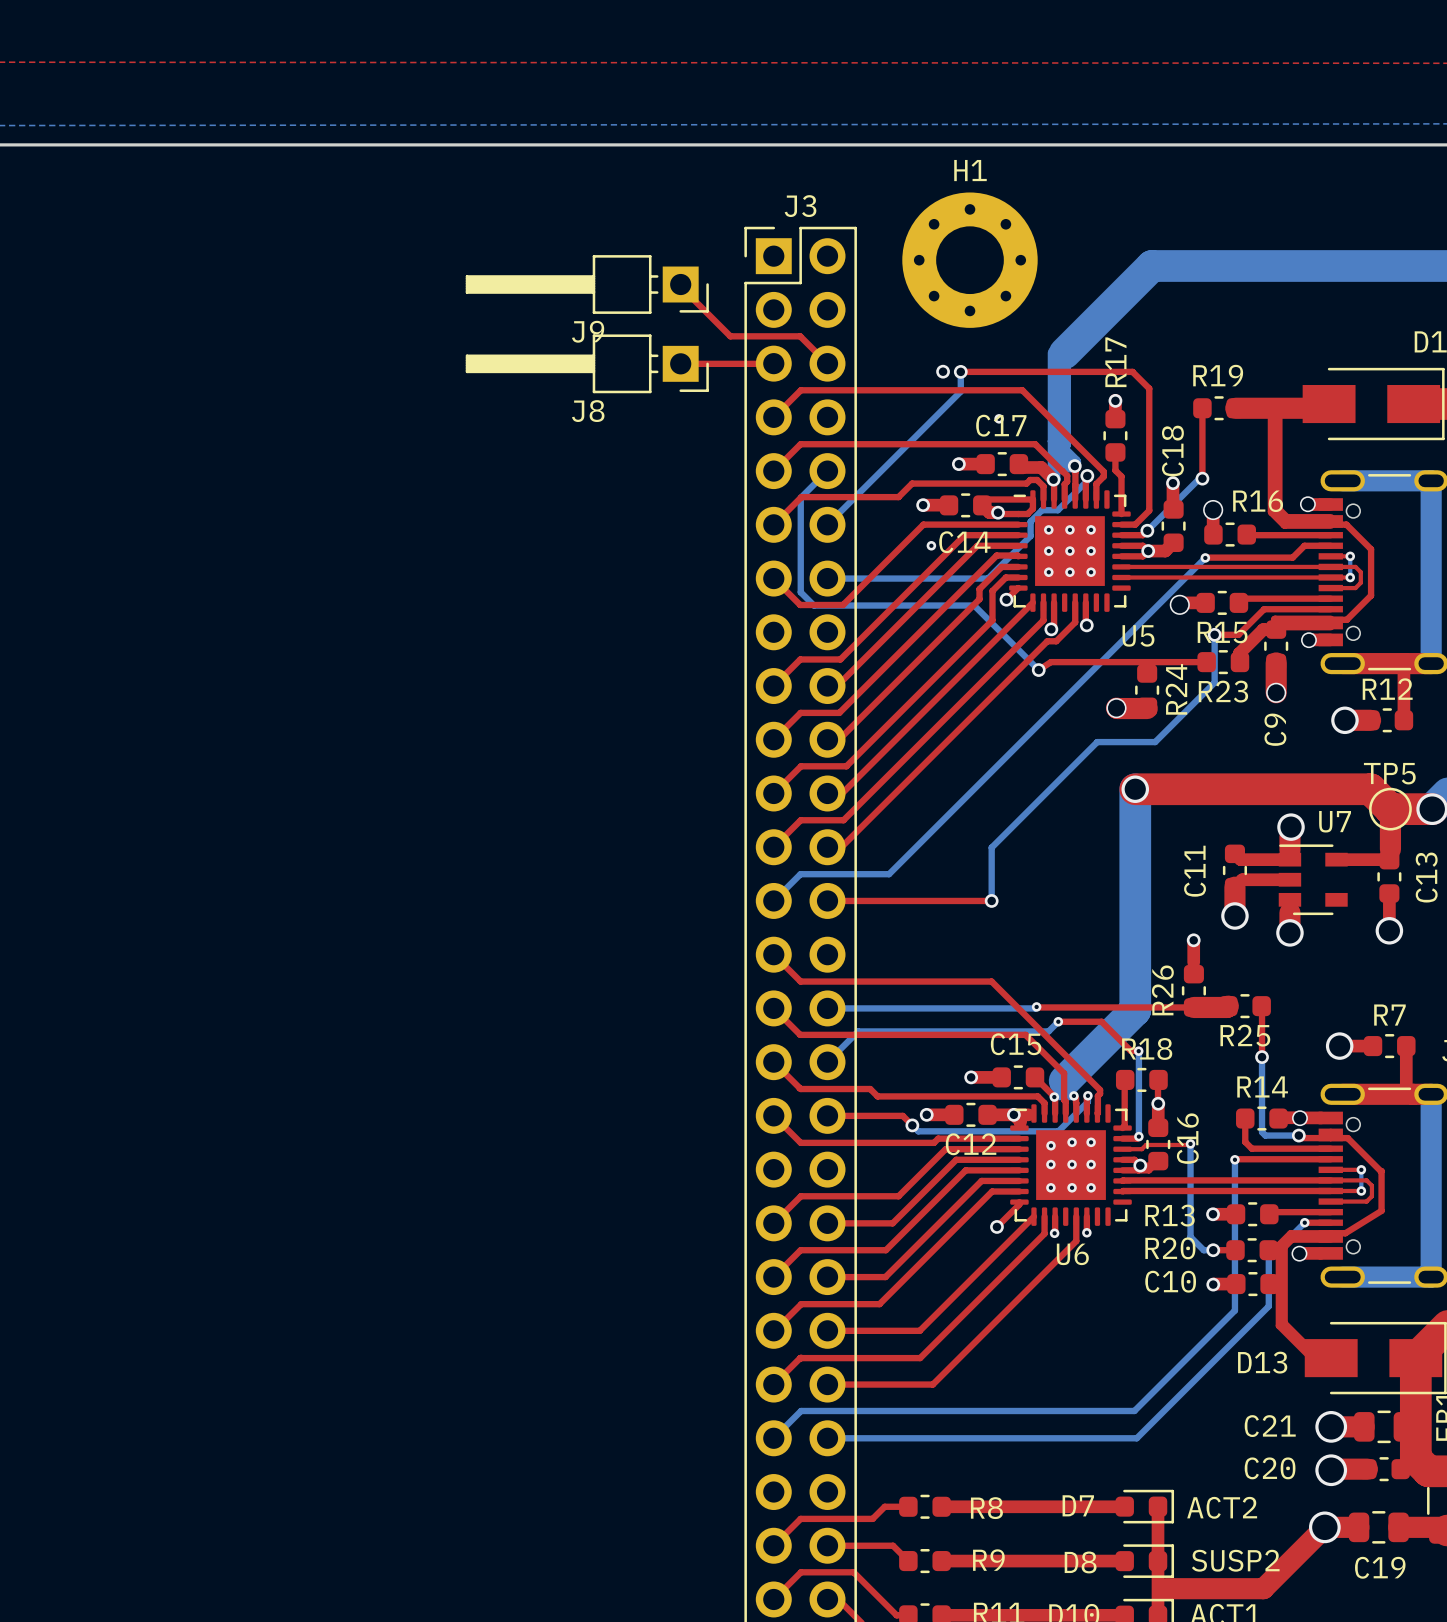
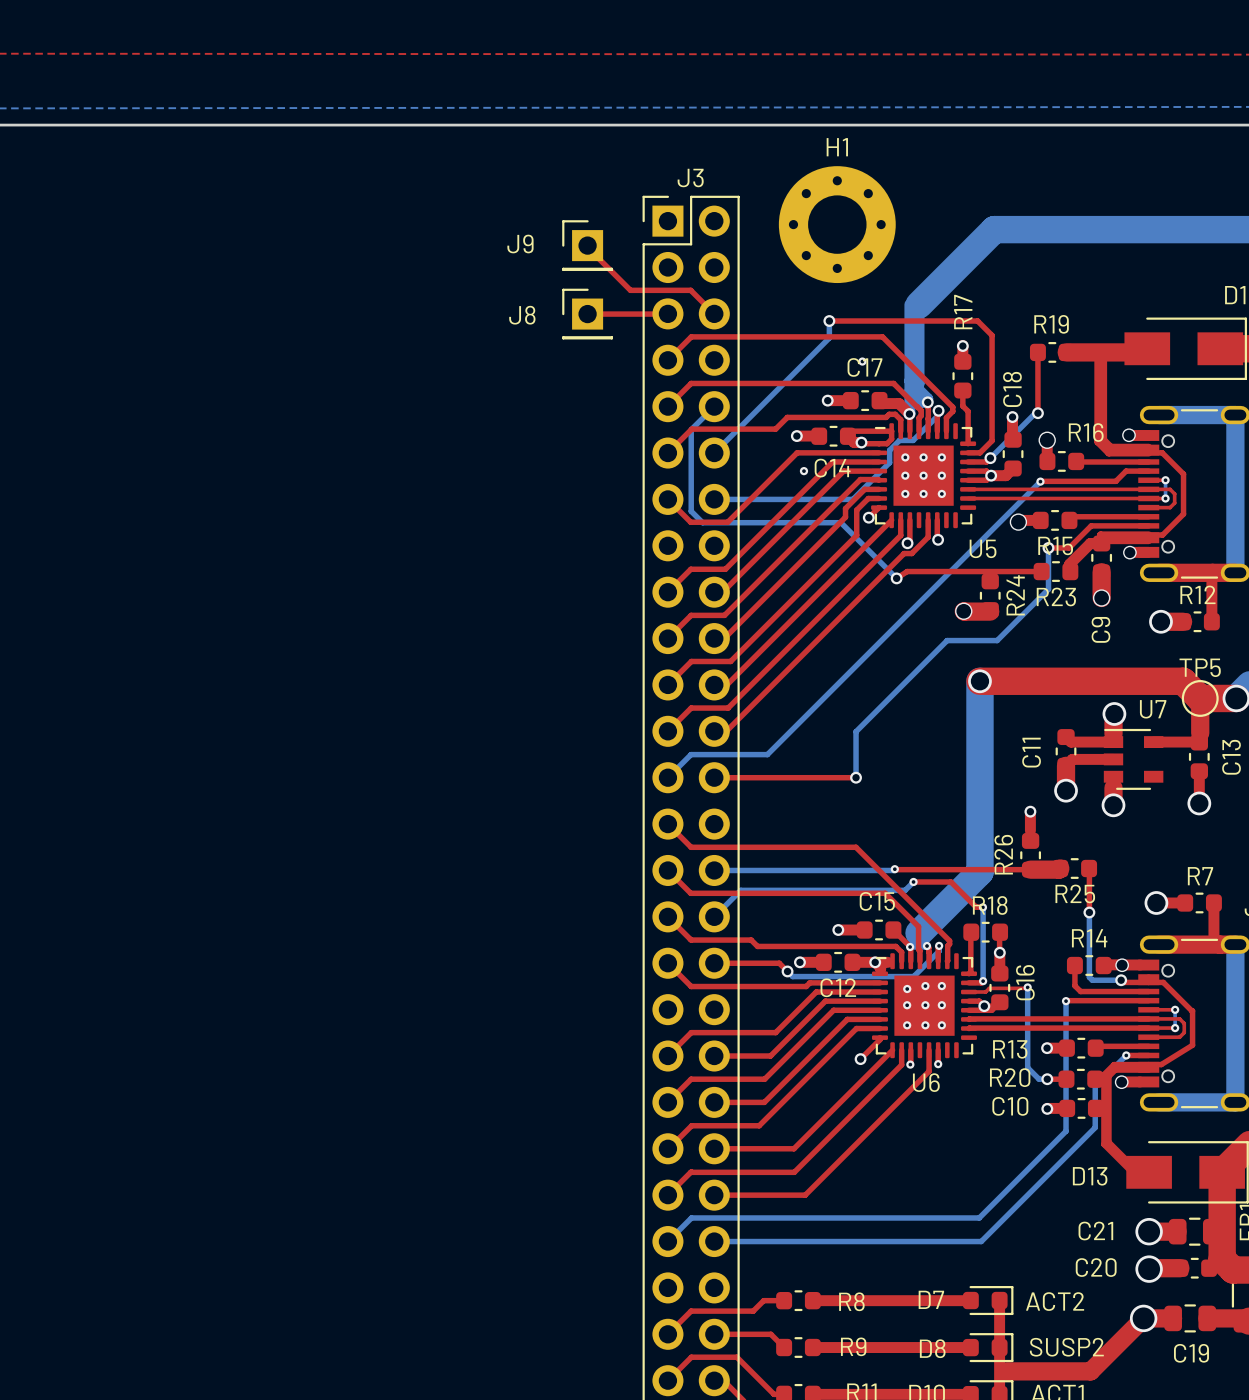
J9 footprint: [465, 255, 709, 314] -> [562, 220, 613, 271]
J9 name position: J9 (588, 331) -> J9 (520, 244)
J8 footprint: [465, 334, 709, 394] -> [562, 288, 613, 340]
via: (943, 371) -> none
J8 name position: J8 (588, 411) -> J8 (522, 315)

